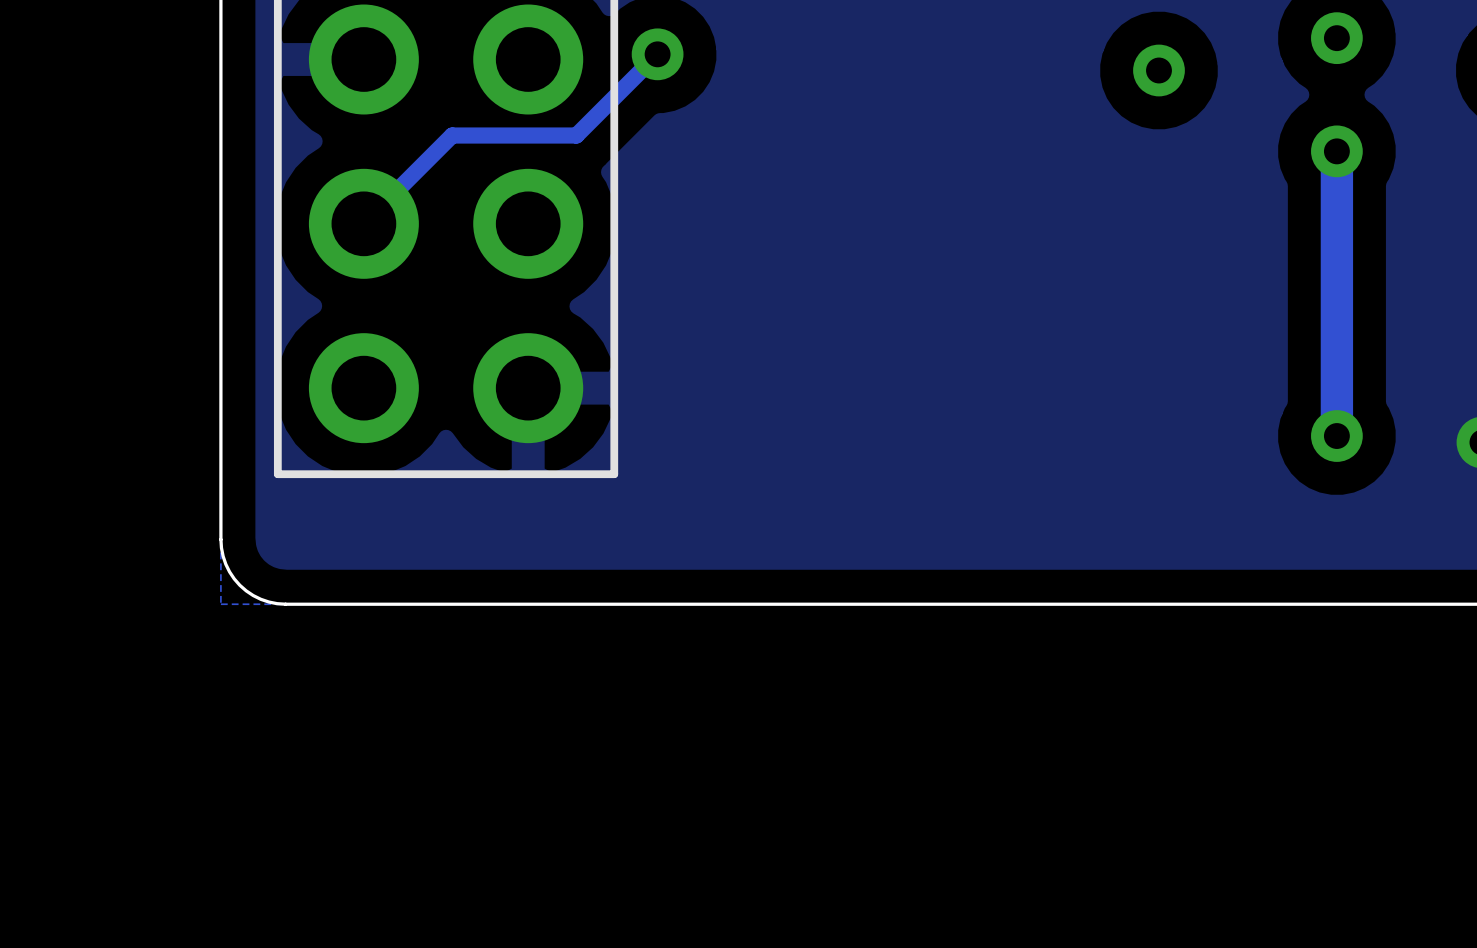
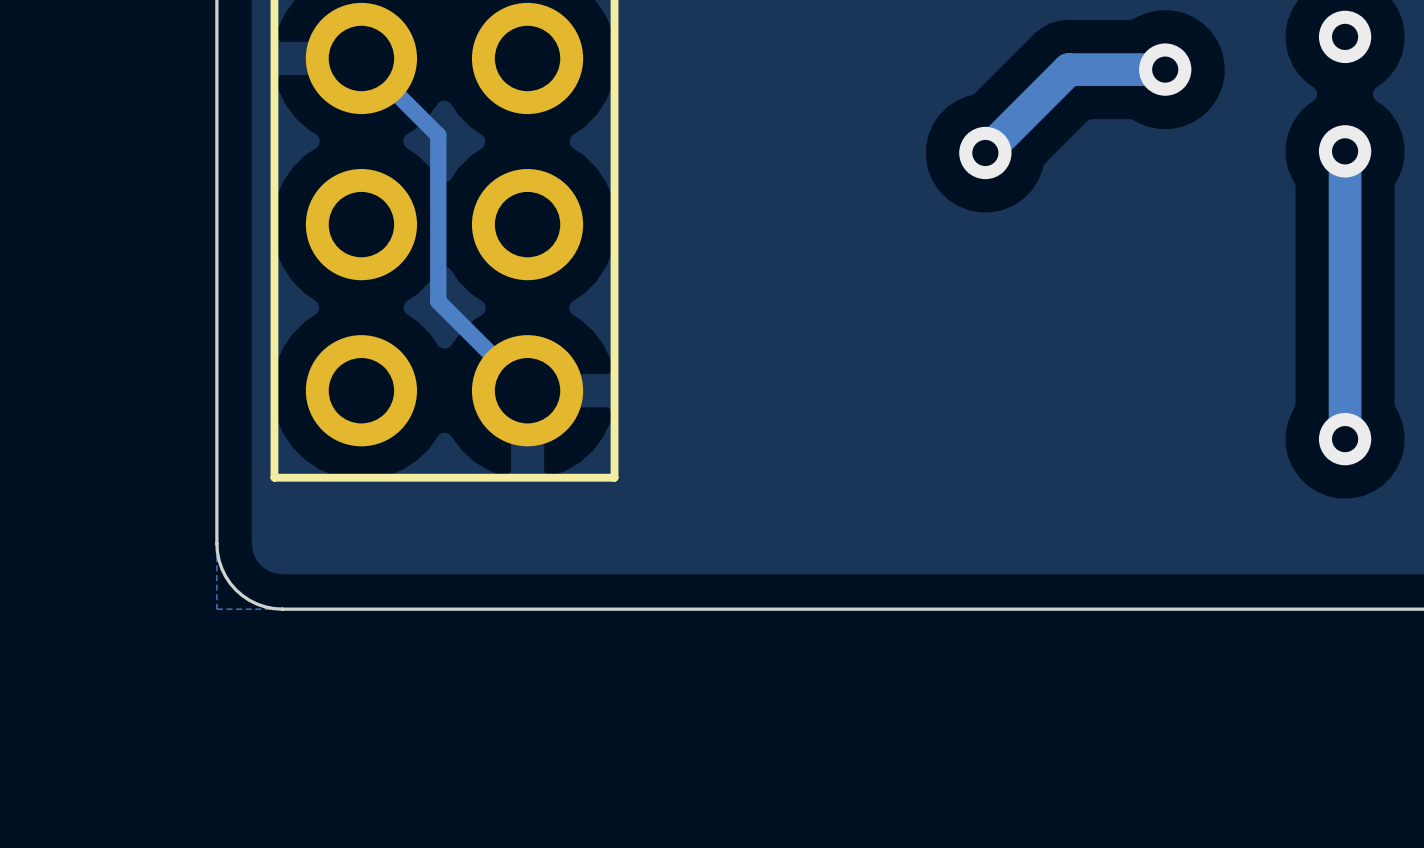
track: (657, 54) (576, 135) (452, 135) (363, 223) -> none
via position: (657, 54) -> (985, 152)
track: none -> (361, 58) (438, 135) (438, 301) (527, 390)
track: none -> (1165, 69) (1068, 69) (985, 152)

